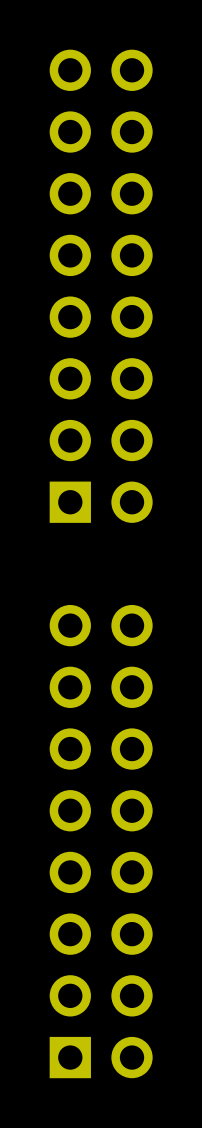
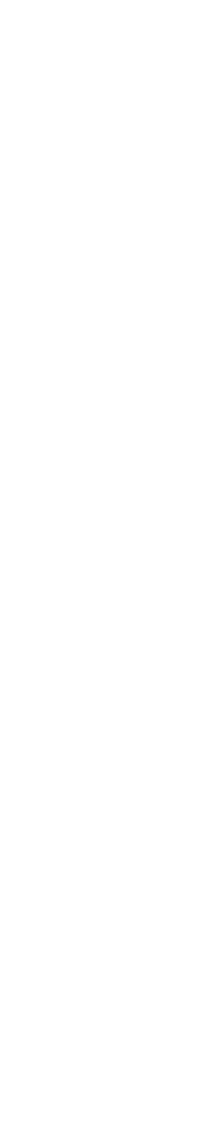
part: (101, 286) -> none
part: (101, 841) -> none

